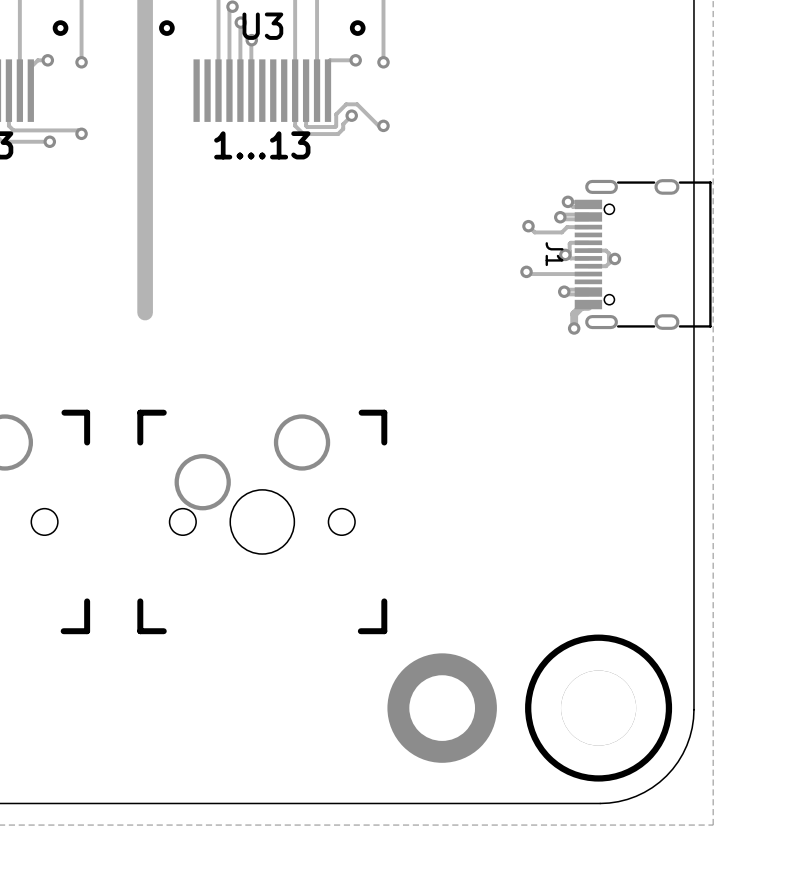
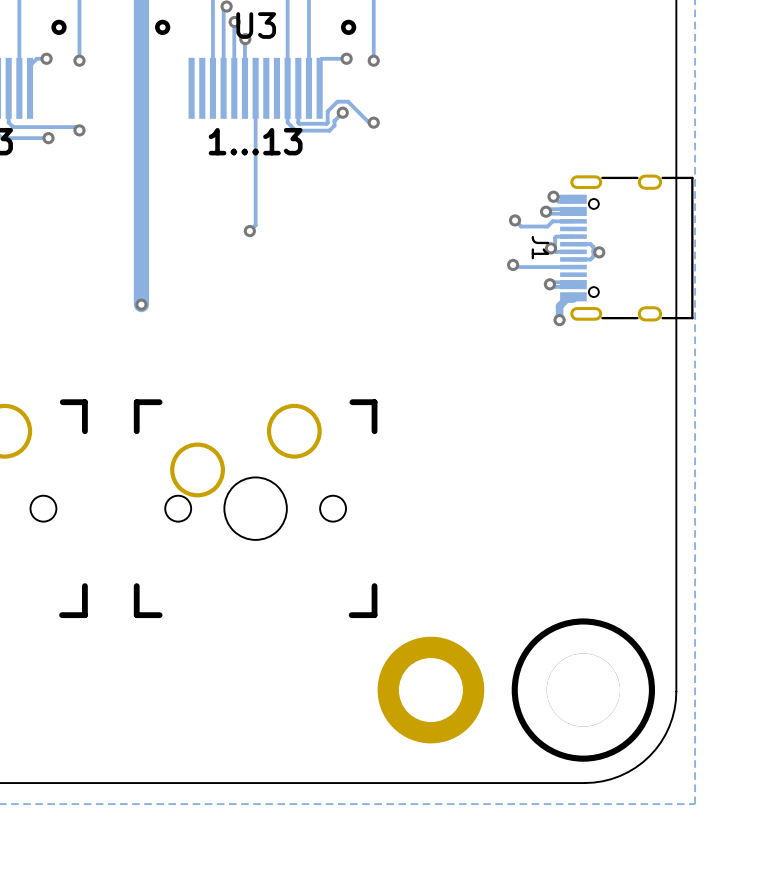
track: none -> (255, 88) (255, 225) (249, 231)
via: none -> (249, 231)
via: none -> (141, 304)

